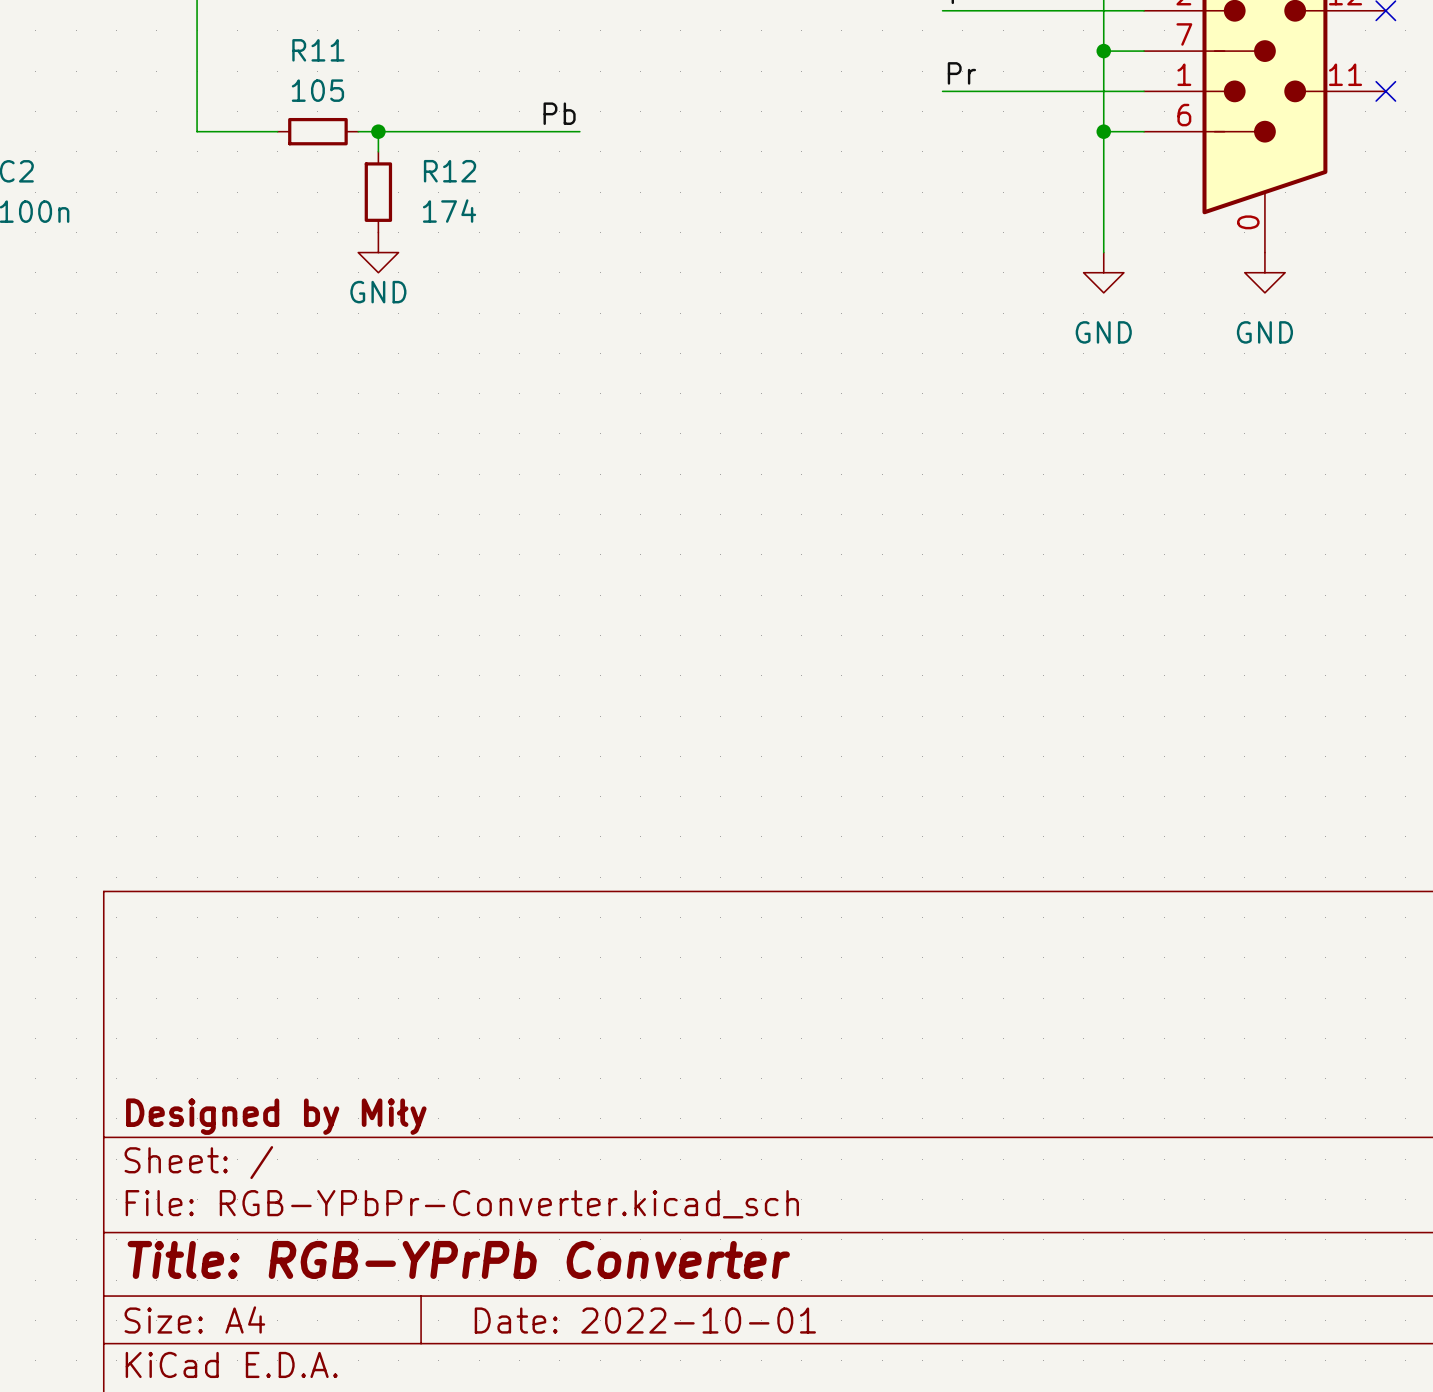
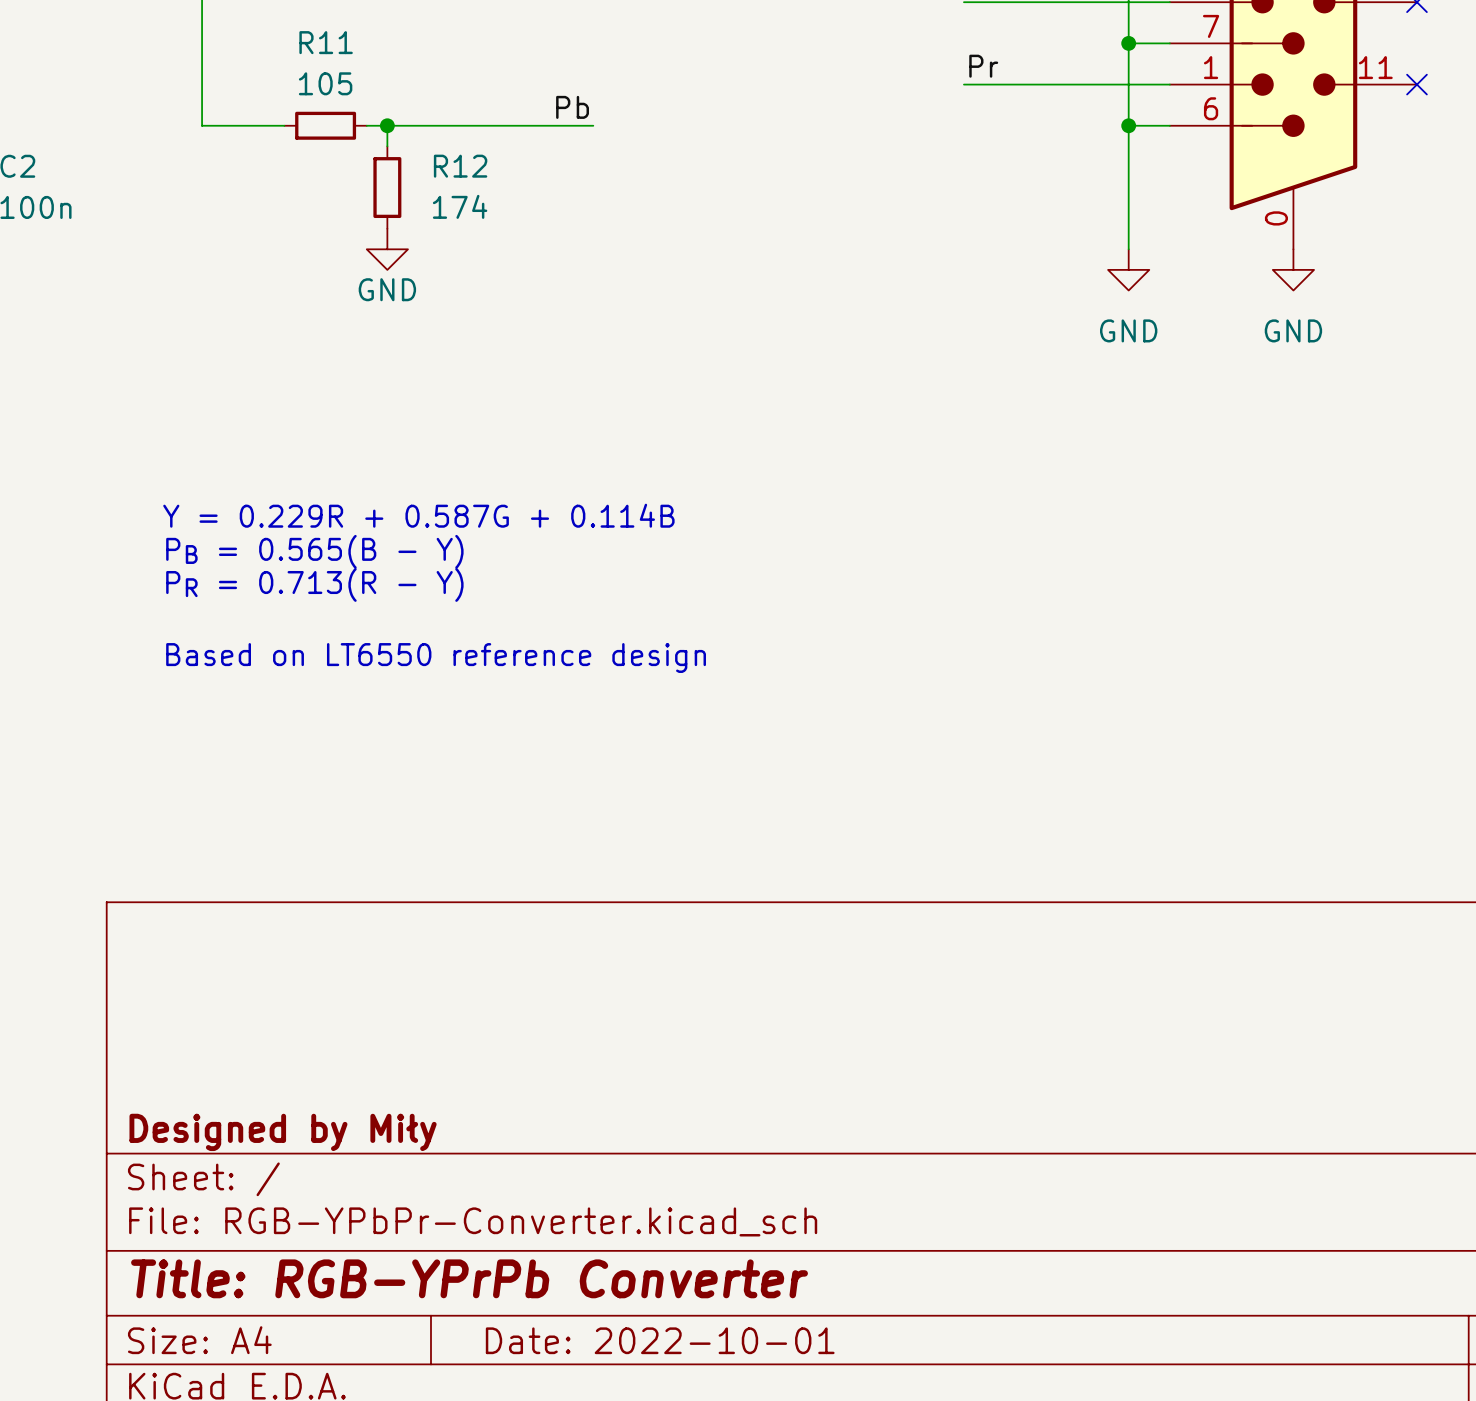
text: none -> Y = 0.229R + 0.587G + 0.114B (418, 515)
text: none -> PB = 0.565(B - Y) (314, 551)
text: none -> PR = 0.713(R - Y) (314, 584)
text: none -> Based on LT6550 reference design (436, 658)

